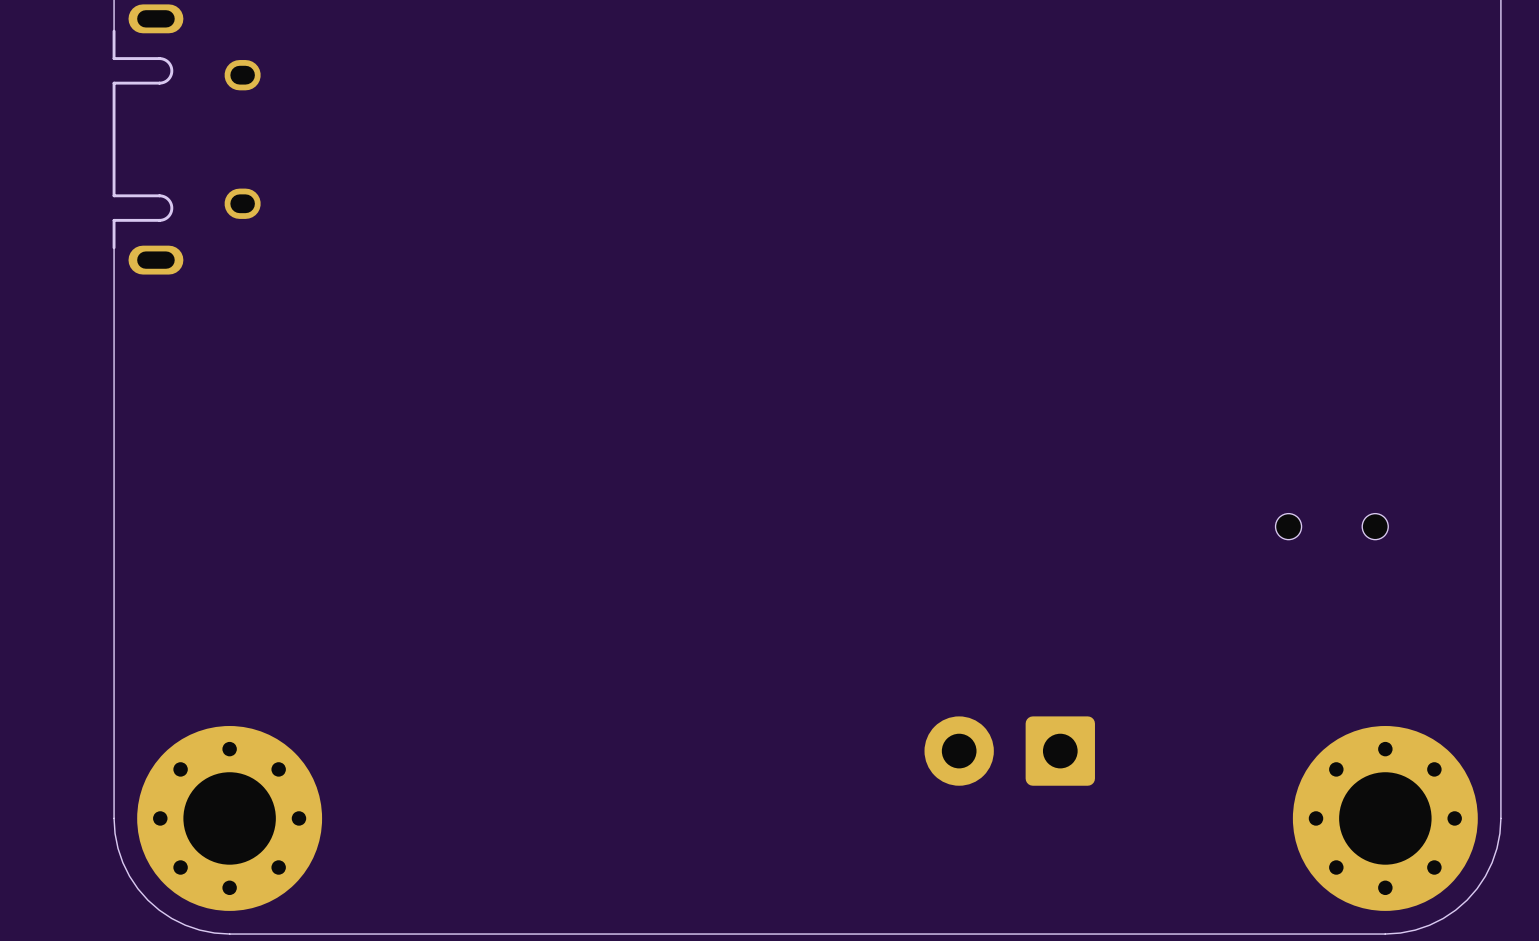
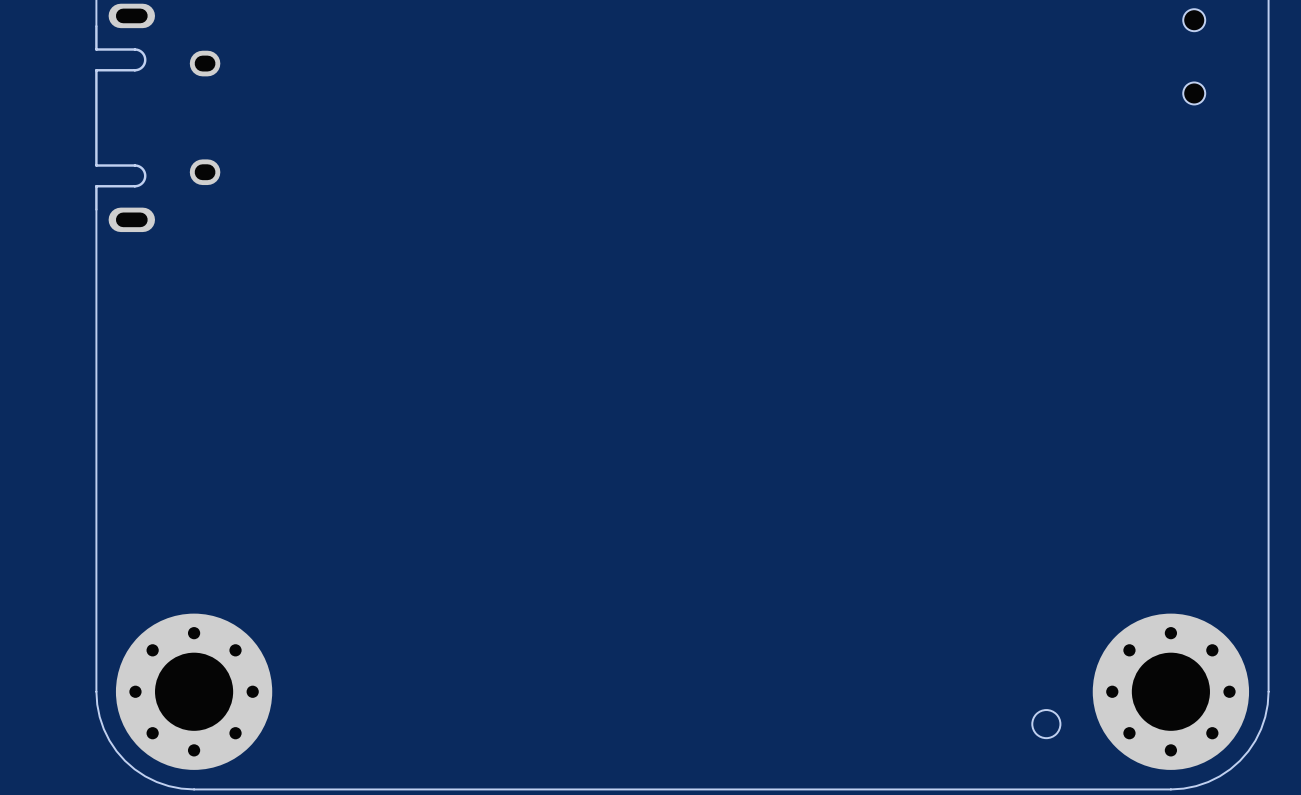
part rotation: 0° (1331, 526) -> 90° clockwise (1194, 56)
part position: (1331, 526) -> (1194, 56)
part: (1009, 751) -> none
round board edge: none -> [1031, 709, 1062, 739]

